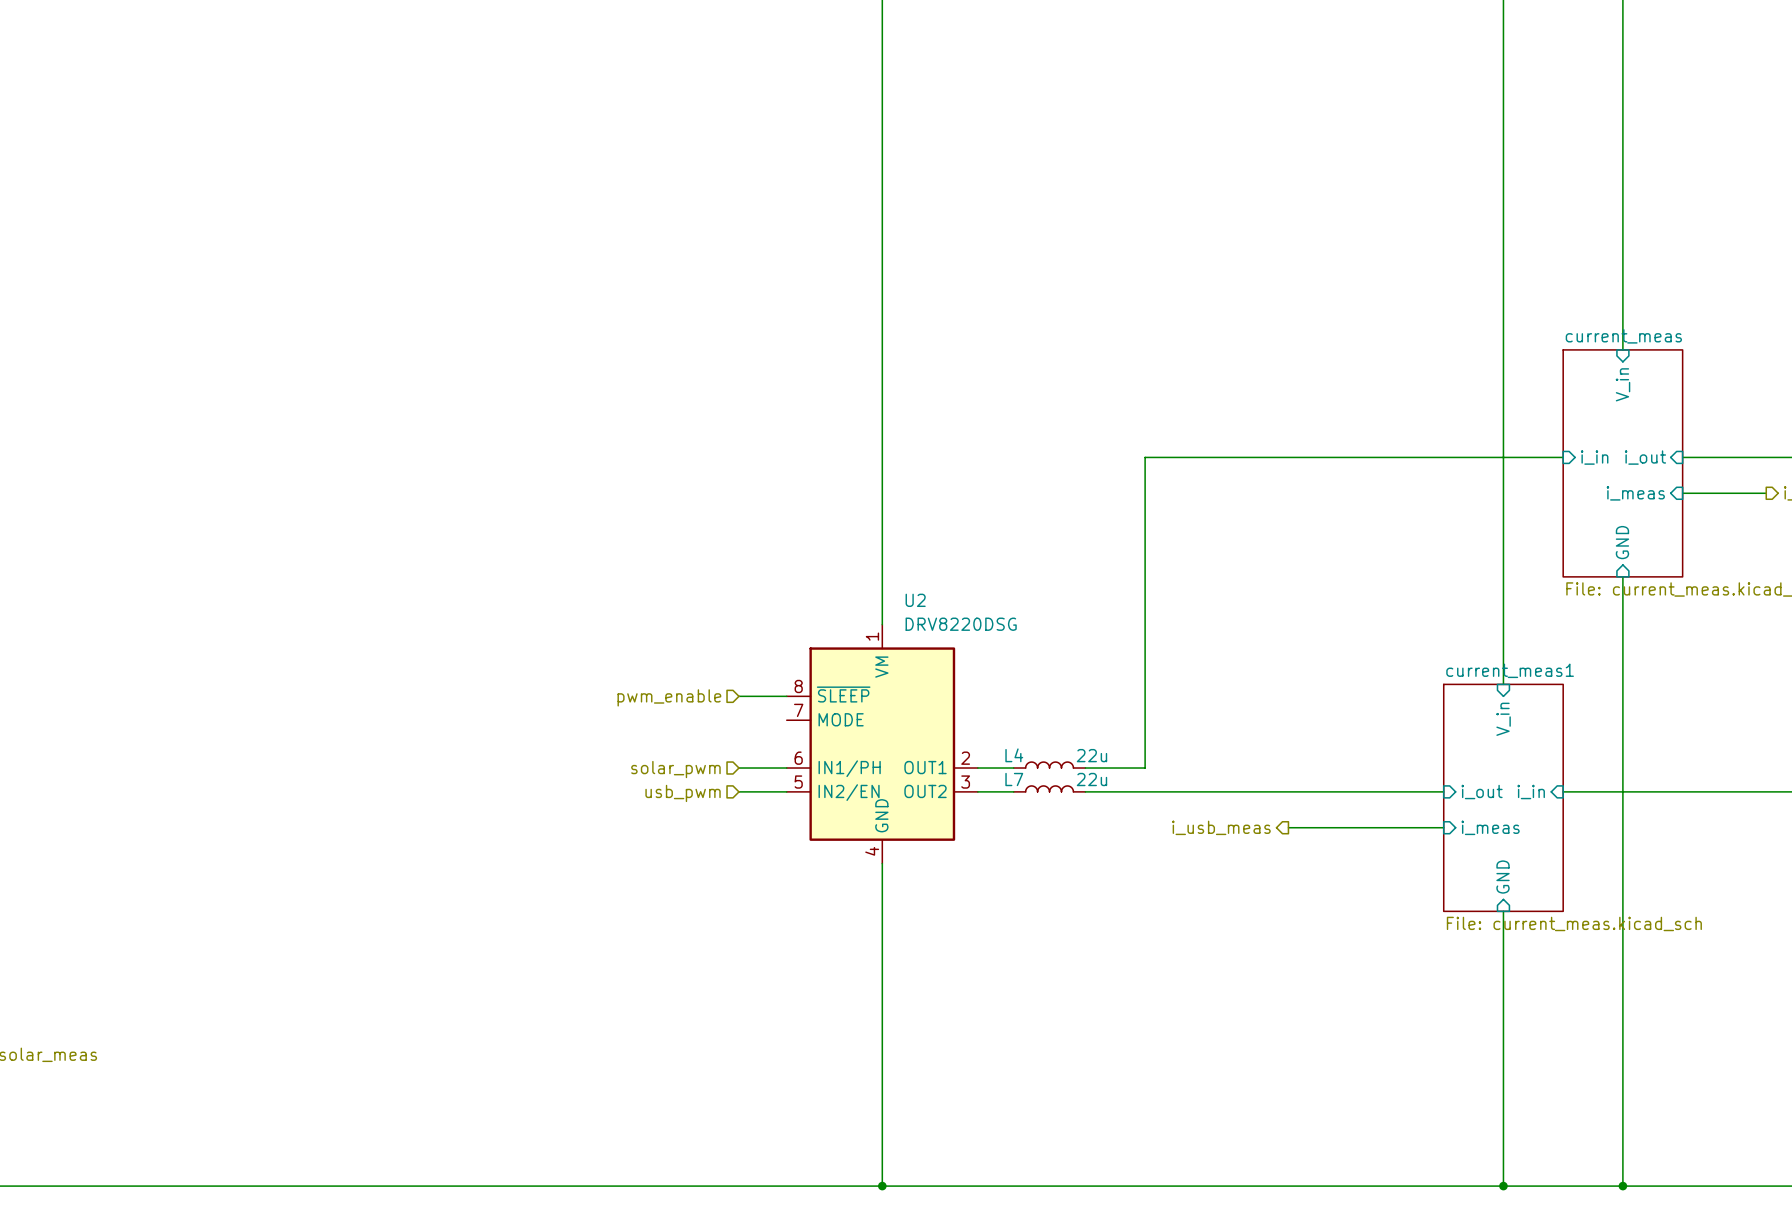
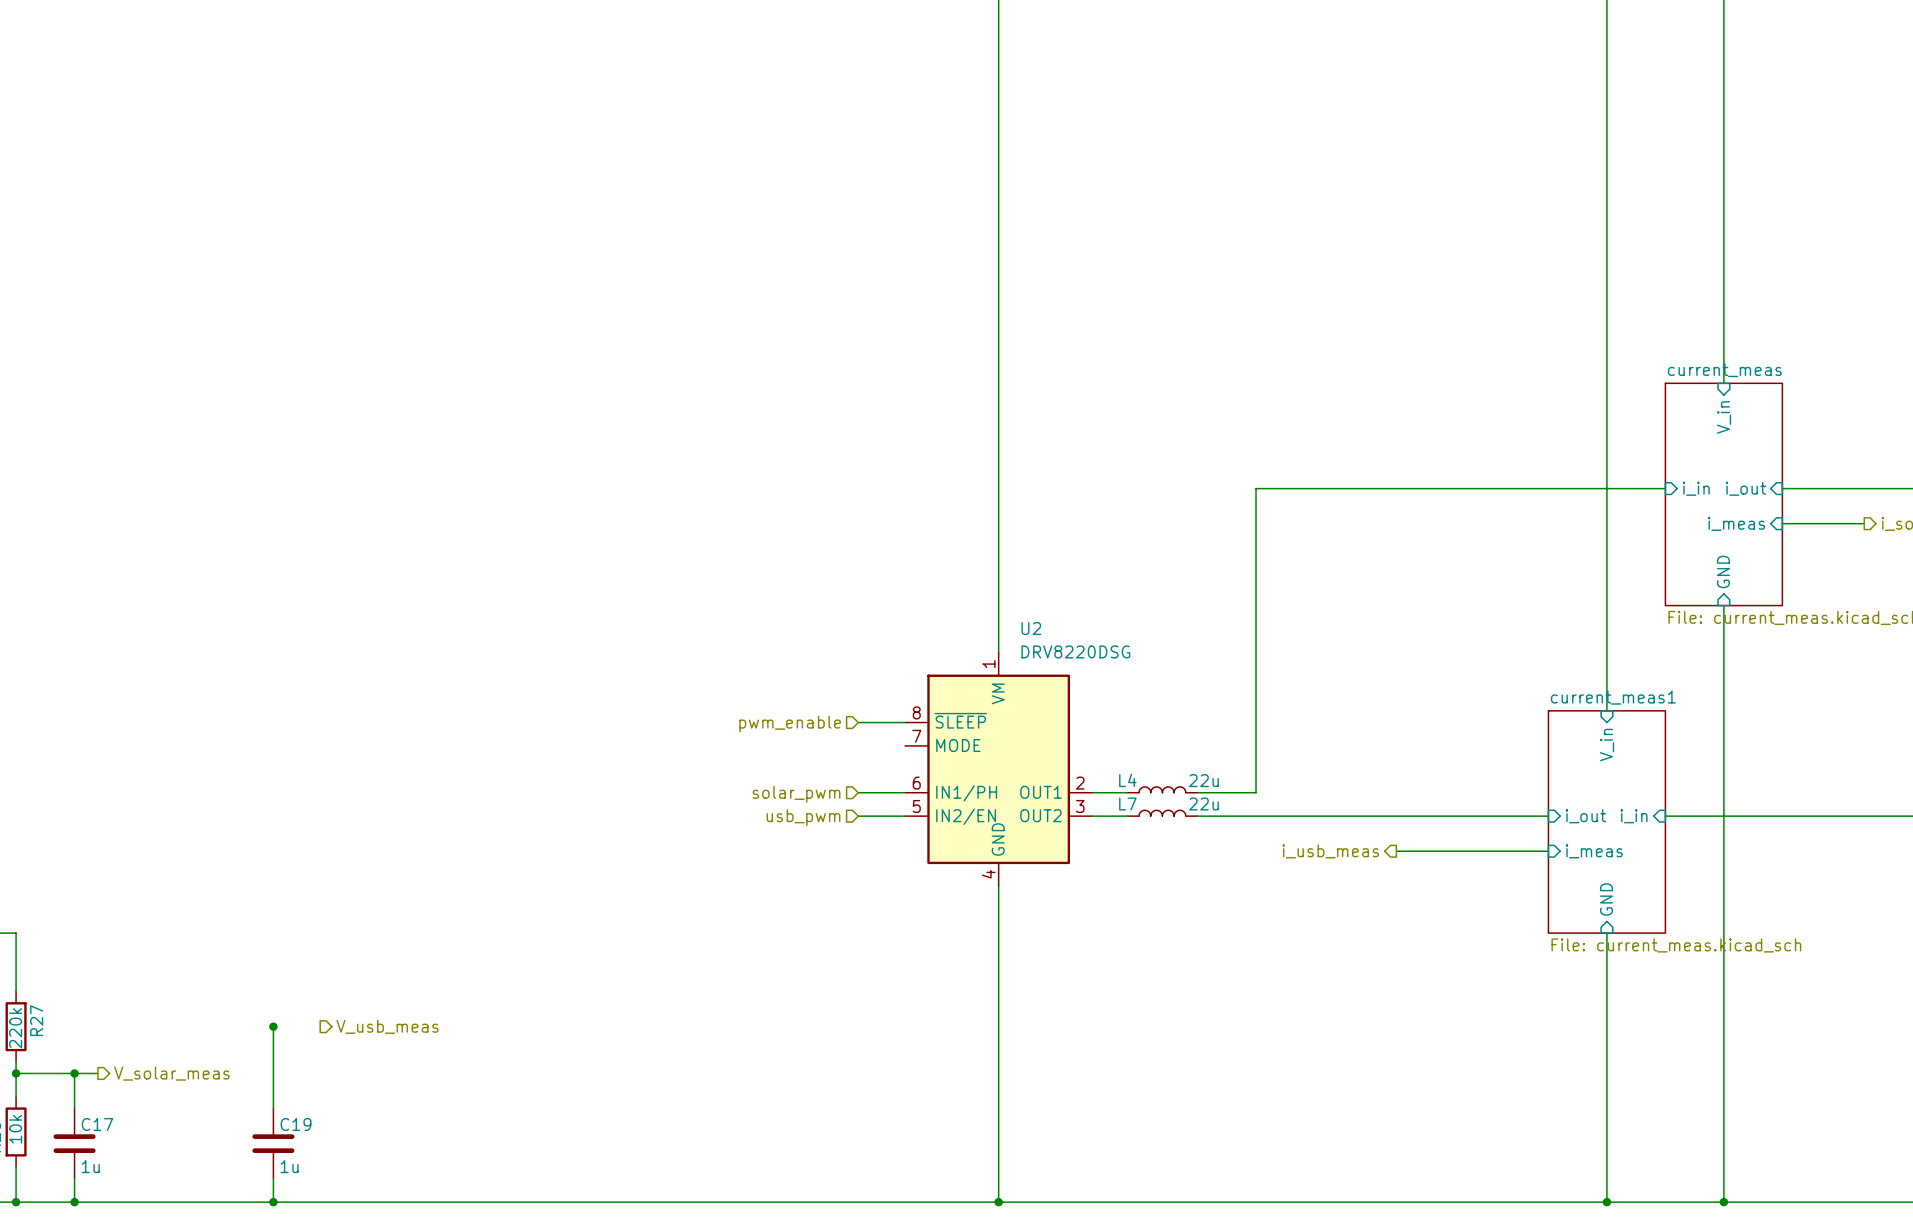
wire: none -> (273, 1026) (273, 1108)
junction: none -> (273, 1026)
hierarchical label: none -> V_usb_meas (387, 1026)
C19: none -> 1u (273, 1143)
wire: none -> (273, 1178) (273, 1202)
junction: none -> (273, 1202)

